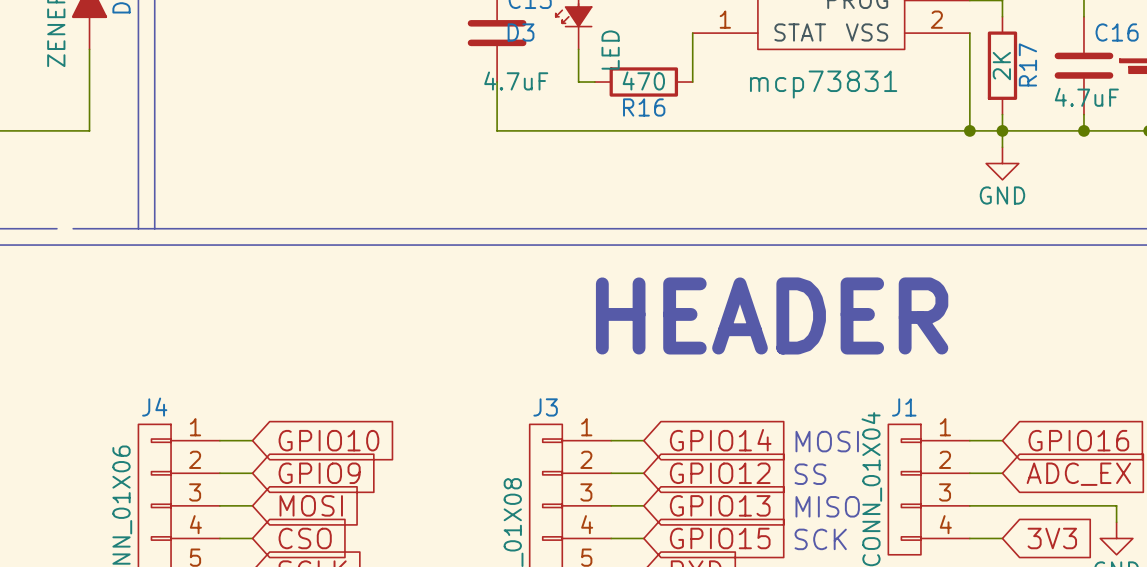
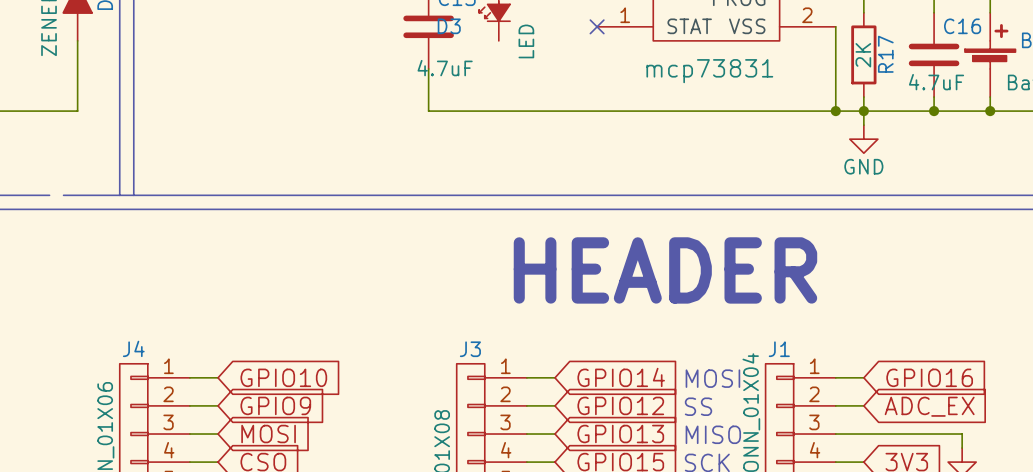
wire: (692, 33) (692, 82) -> none
no-connect mark: none -> (597, 26)
wire: (578, 49) (578, 82) (594, 82) -> none
R16: 470 (643, 82) -> none

